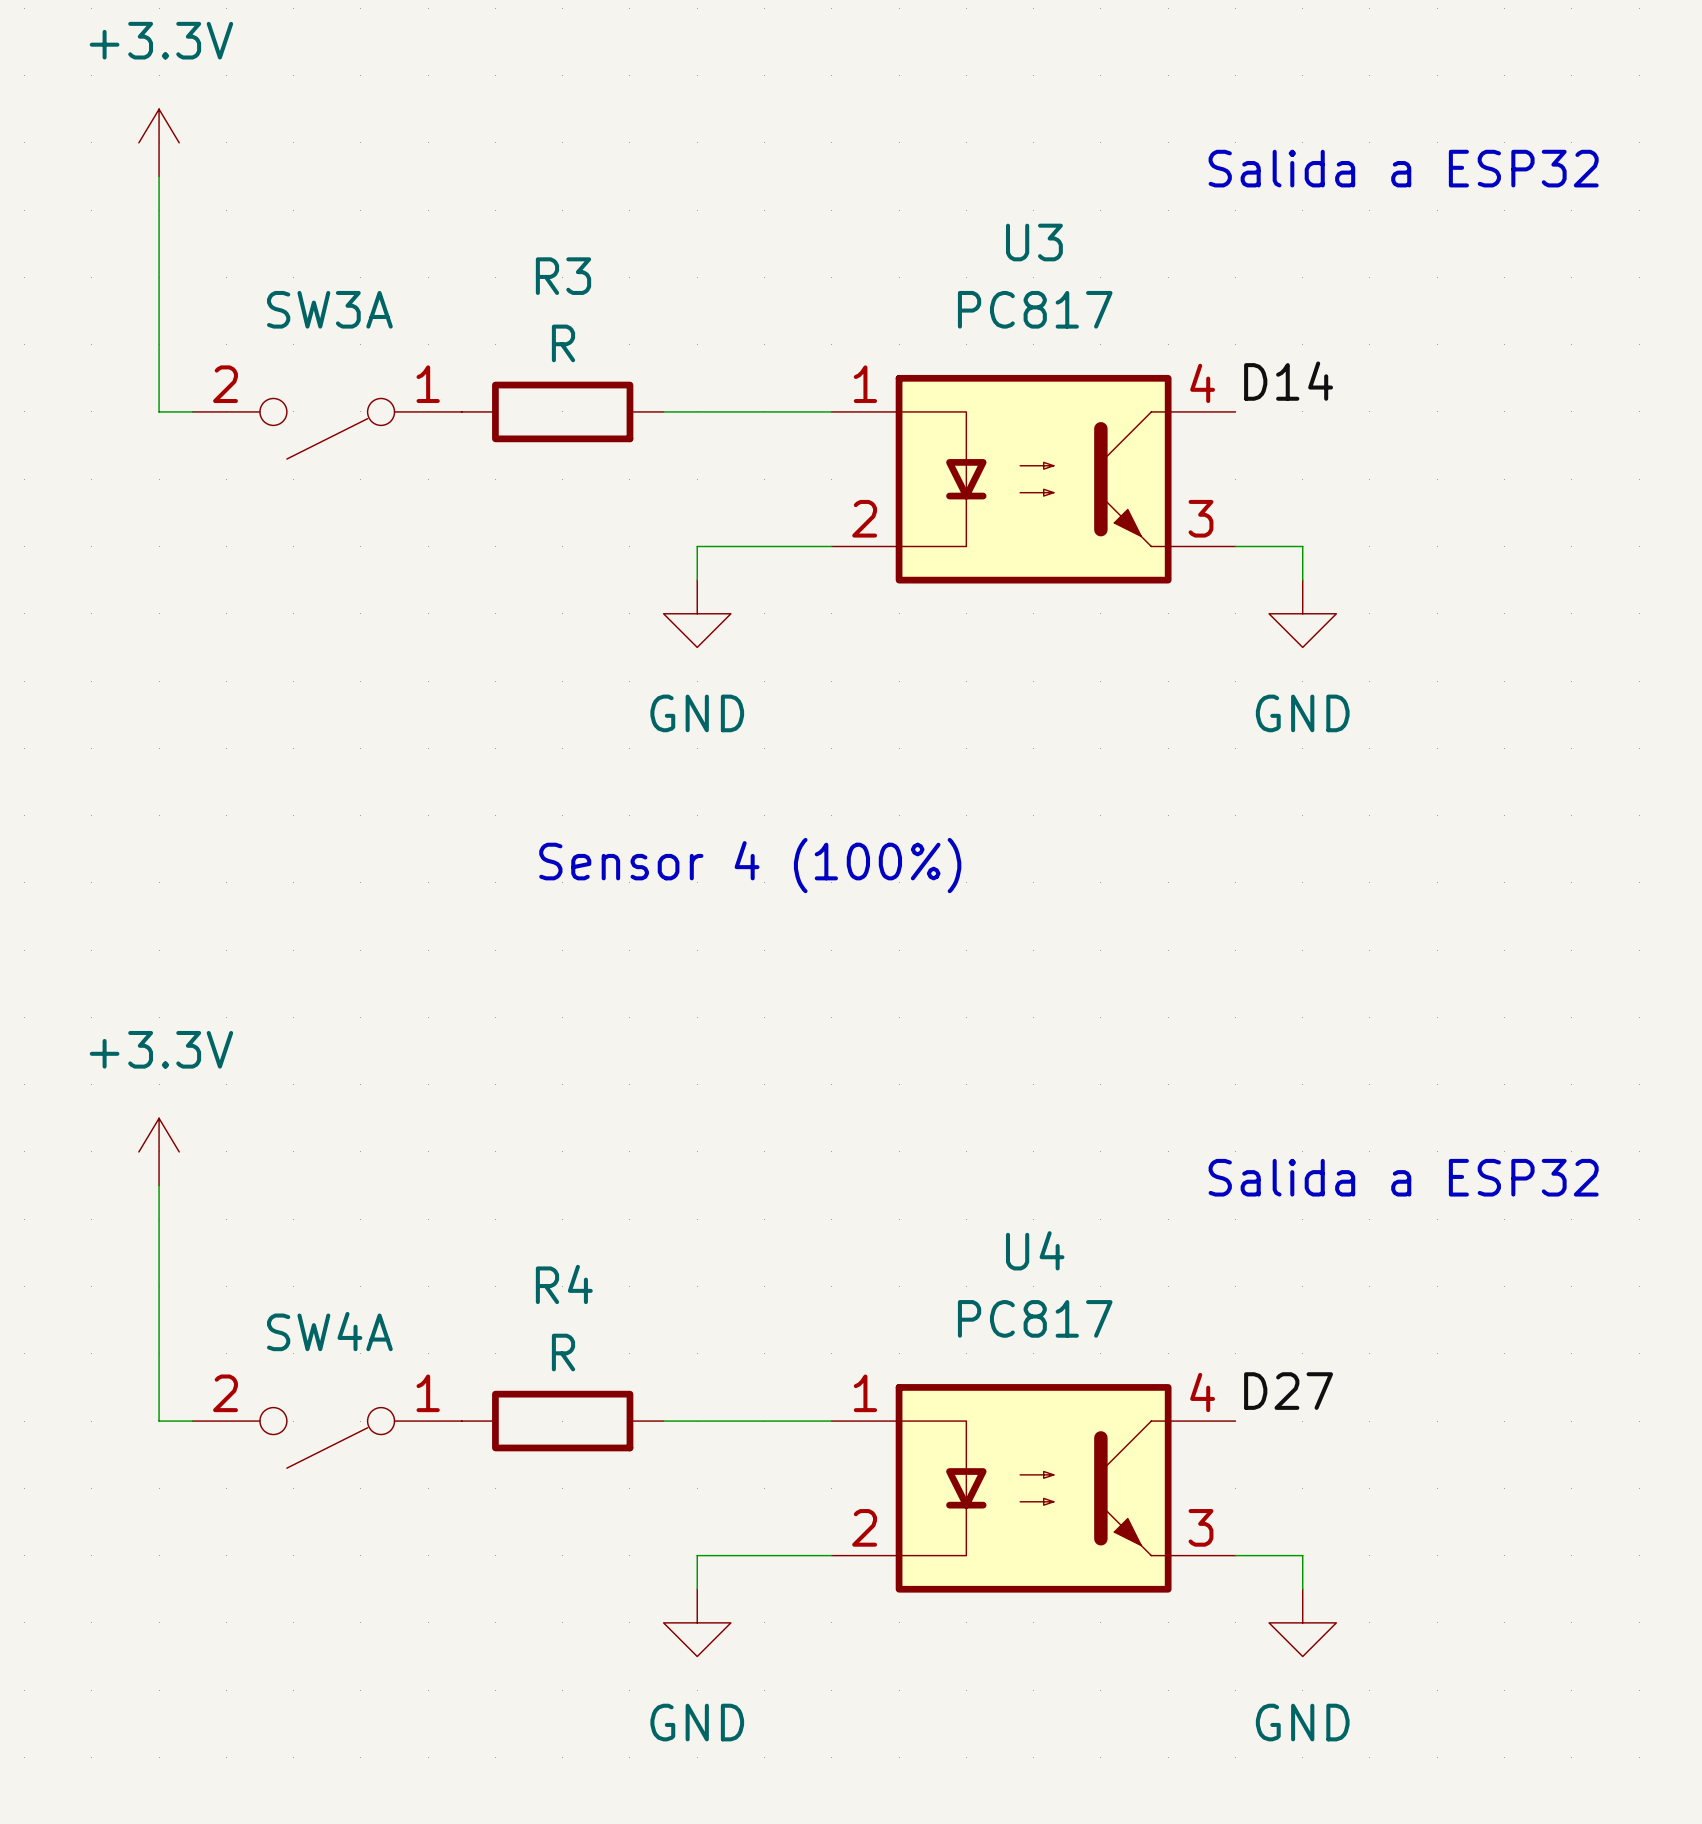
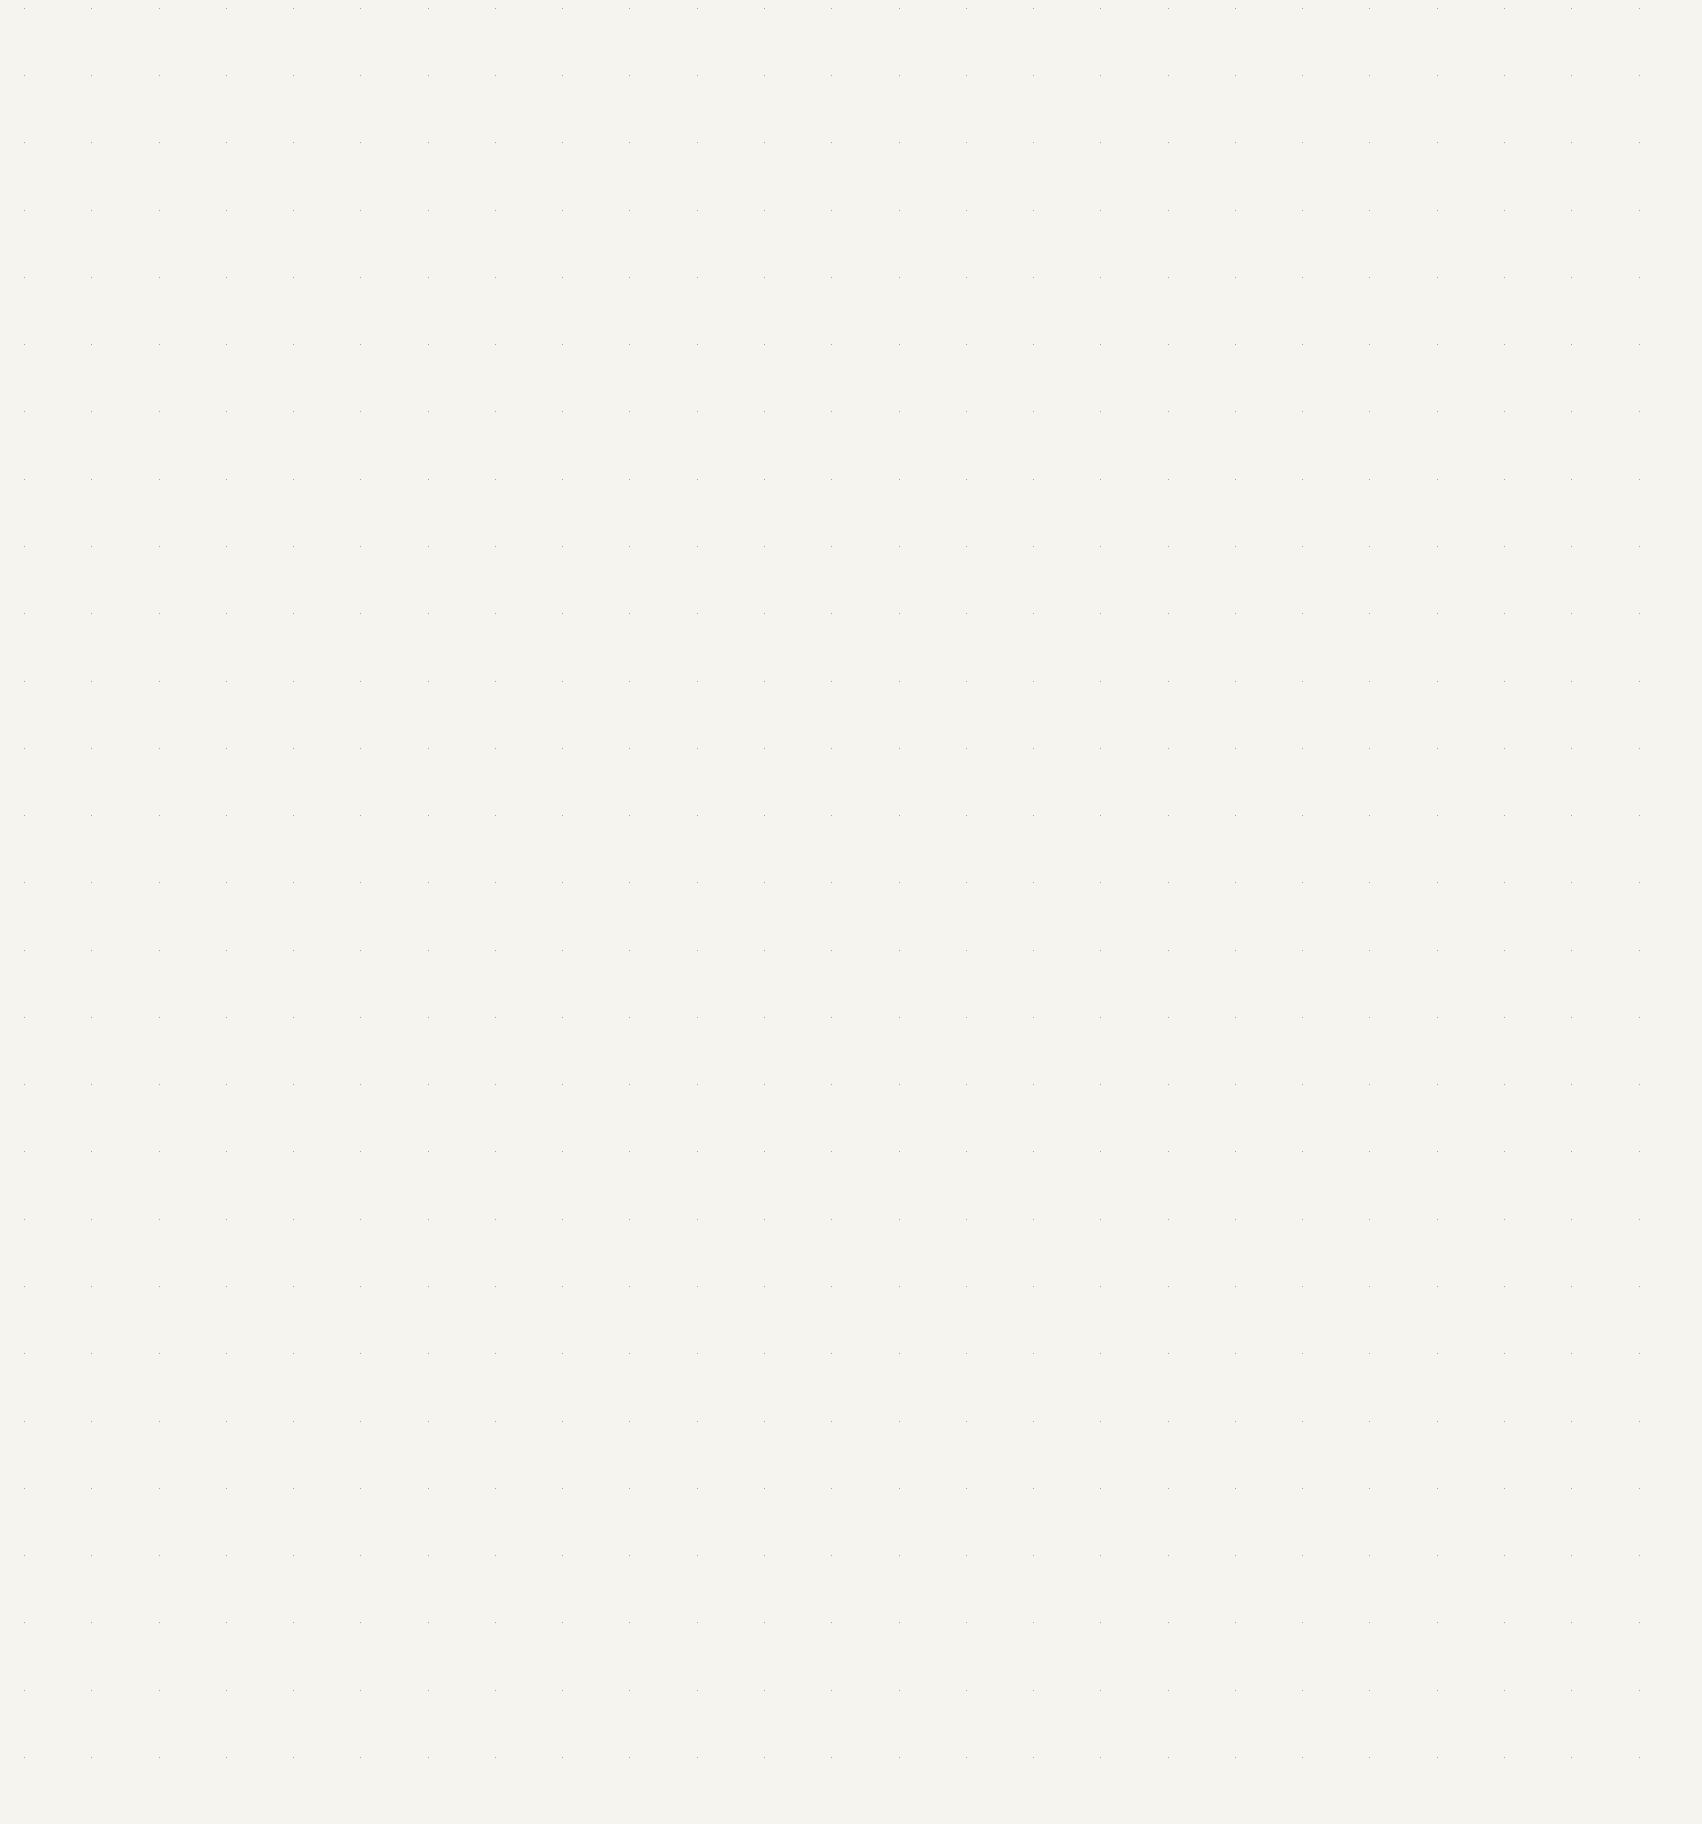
power symbol: +3.3V (159, 142) -> none
text: Salida a ESP32 (1403, 168) -> none
wire: (159, 176) (159, 411) (192, 411) -> none
label: D14 (1288, 381) -> none
R3: R (562, 411) -> none
wire: (663, 411) (831, 411) -> none
SW3A: (327, 428) -> none
U3: PC817 (1033, 479) -> none
wire: (831, 546) (697, 546) (697, 580) -> none
wire: (1235, 546) (1302, 546) (1302, 580) -> none
power symbol: GND (697, 613) -> none
power symbol: GND (1302, 613) -> none
text: Sensor 4 (100%) (750, 865) -> none
power symbol: +3.3V (159, 1151) -> none
text: Salida a ESP32 (1403, 1177) -> none
wire: (159, 1185) (159, 1421) (192, 1421) -> none
label: D27 (1288, 1391) -> none
R4: R (562, 1421) -> none
wire: (663, 1421) (831, 1421) -> none
SW4A: (327, 1437) -> none
U4: PC817 (1033, 1488) -> none
wire: (831, 1555) (697, 1555) (697, 1589) -> none
wire: (1235, 1555) (1302, 1555) (1302, 1589) -> none
power symbol: GND (697, 1622) -> none
power symbol: GND (1302, 1622) -> none

